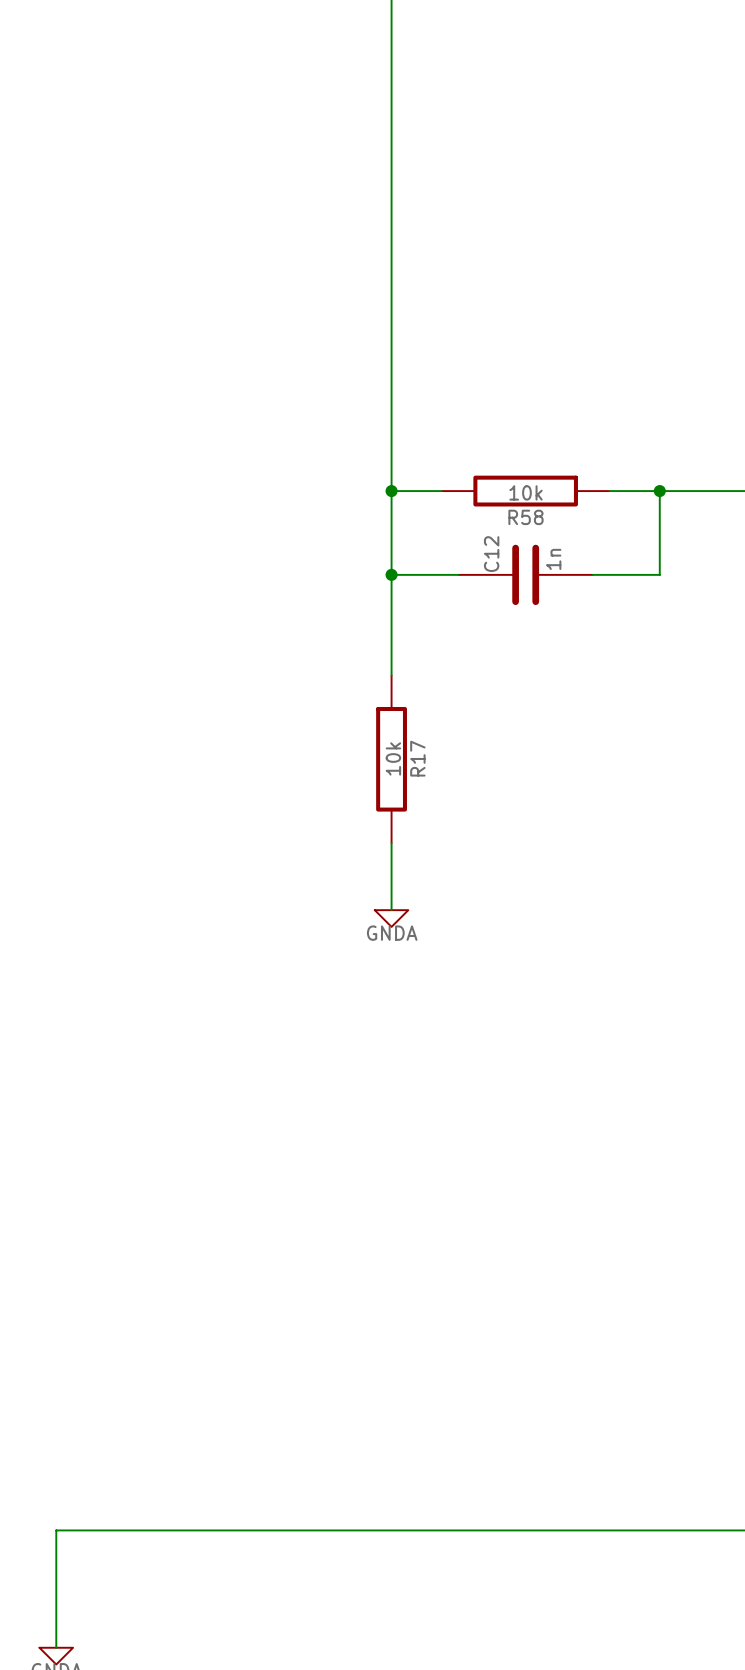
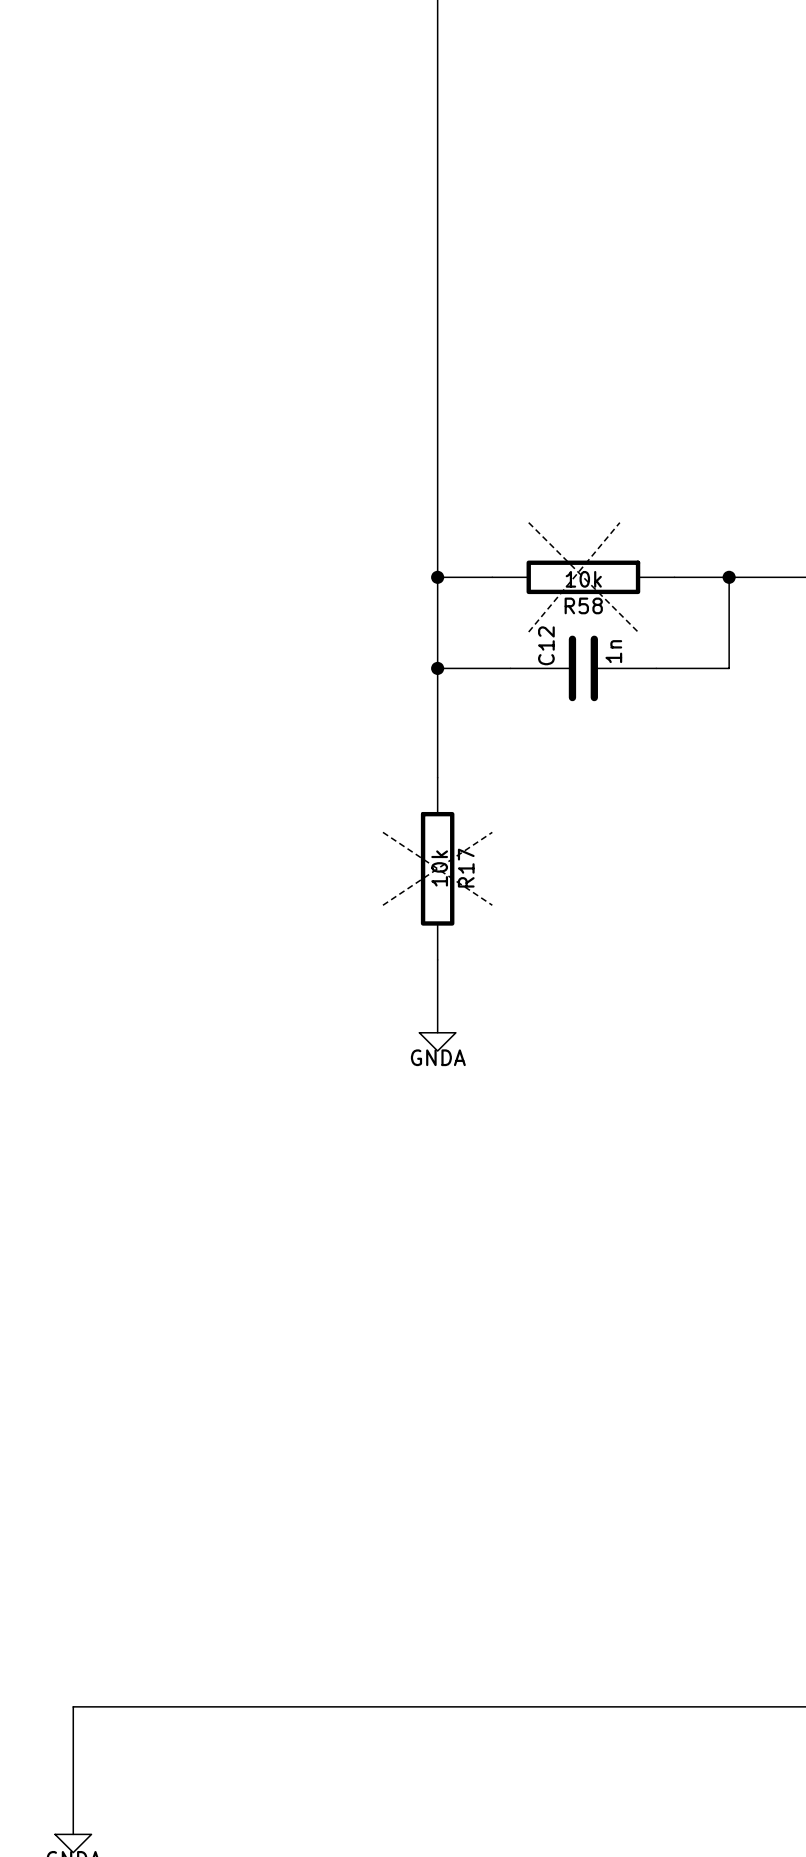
line: none -> (528, 522) (638, 631)
line: none -> (619, 522) (528, 631)
line: none -> (382, 832) (492, 905)
line: none -> (492, 832) (382, 905)

